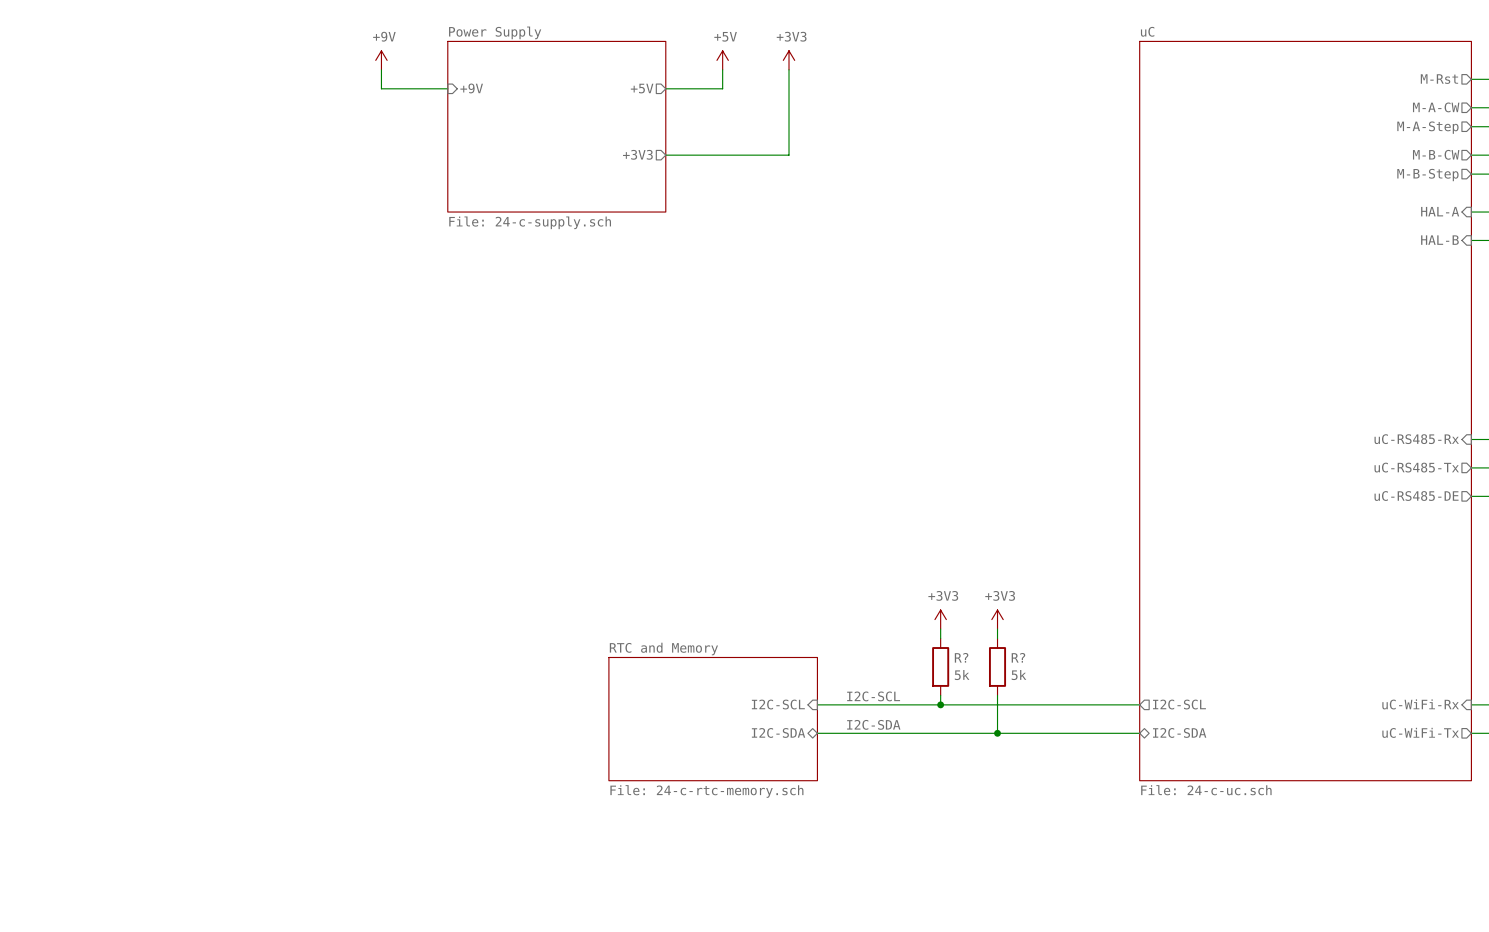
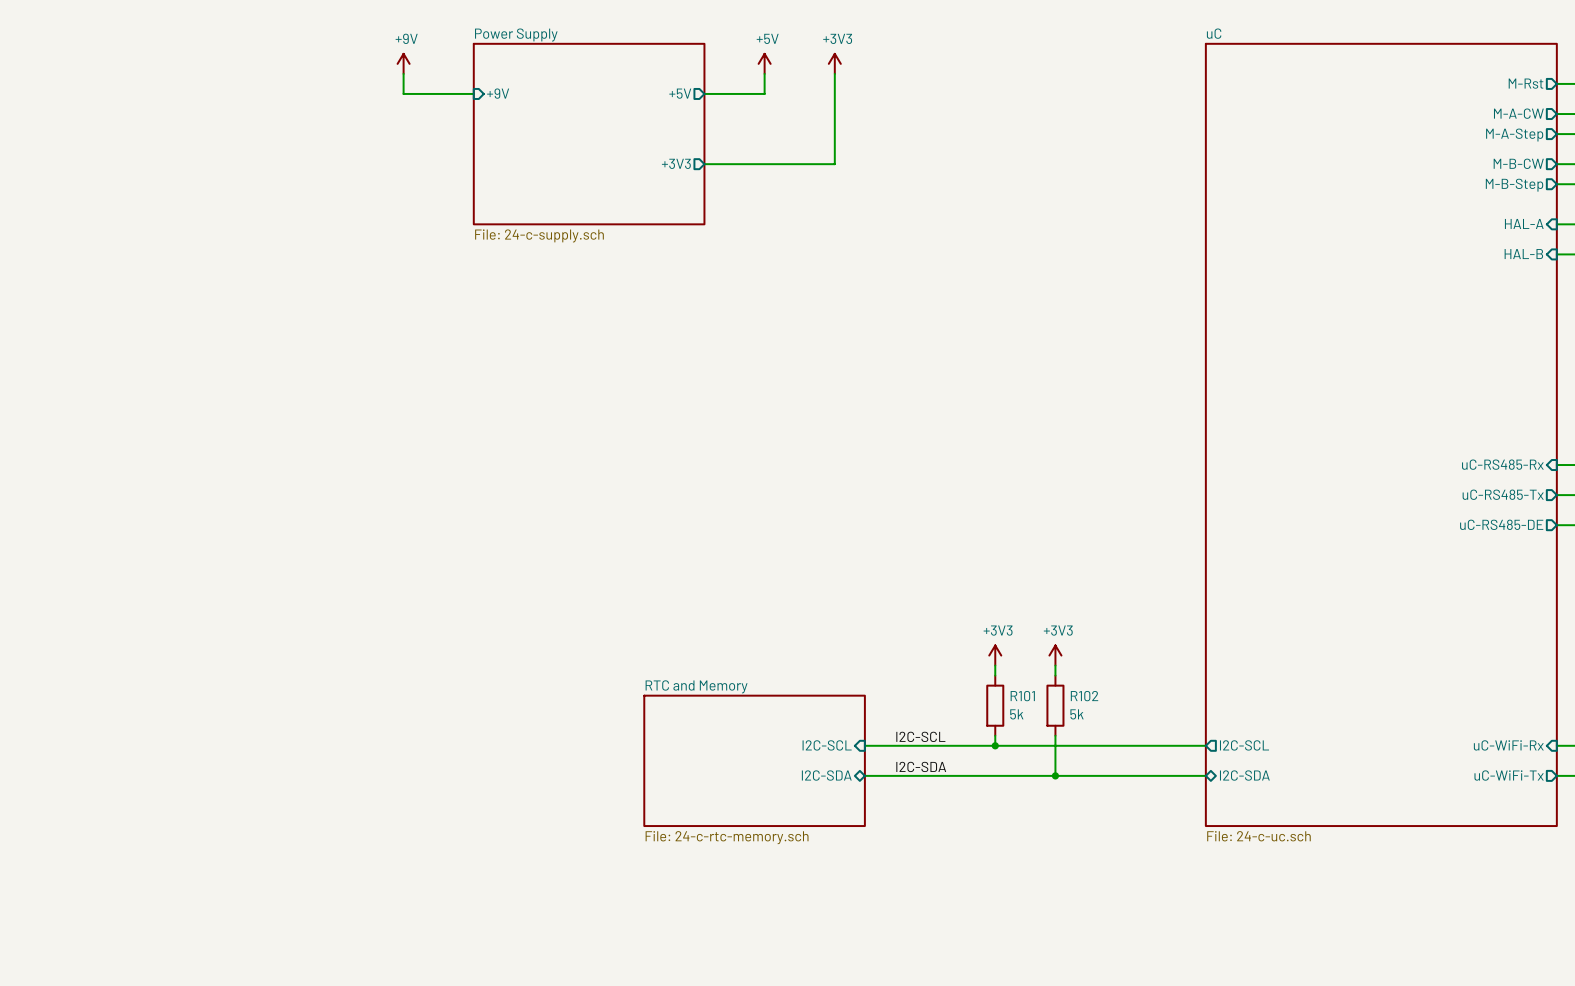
R? name: R? (961, 657) -> R101 (1022, 696)
R? name: R? (1018, 657) -> R102 (1084, 696)

